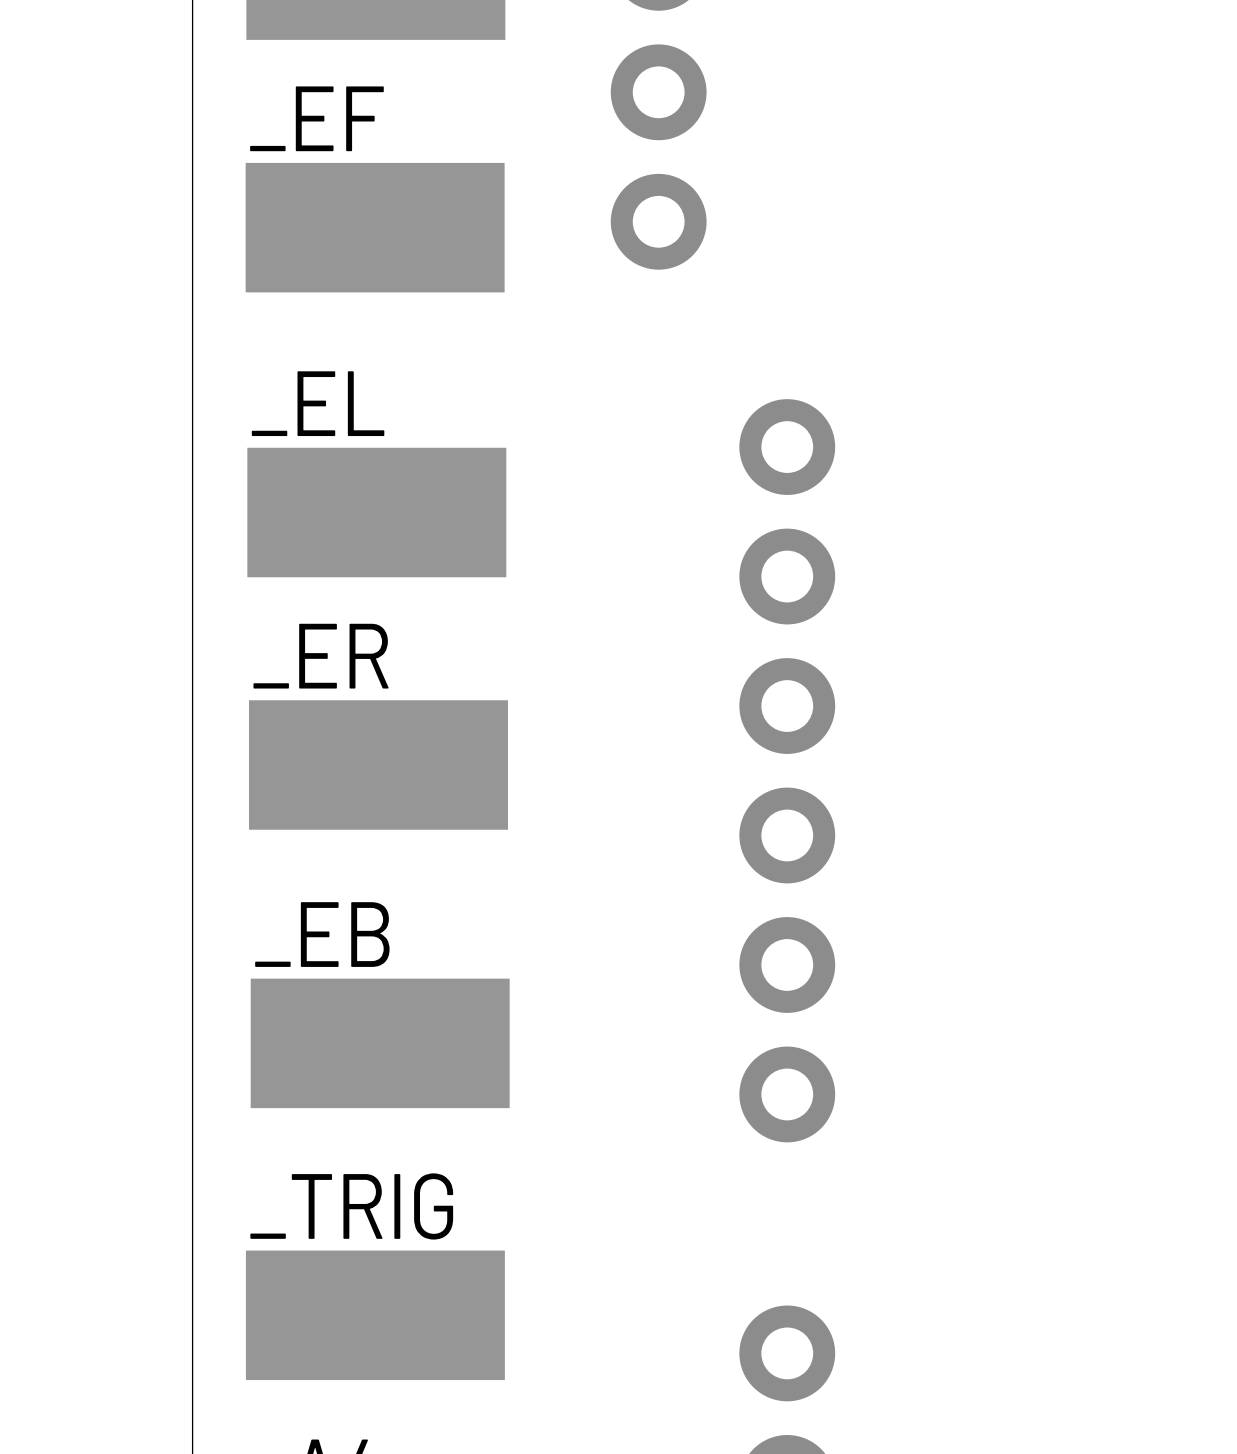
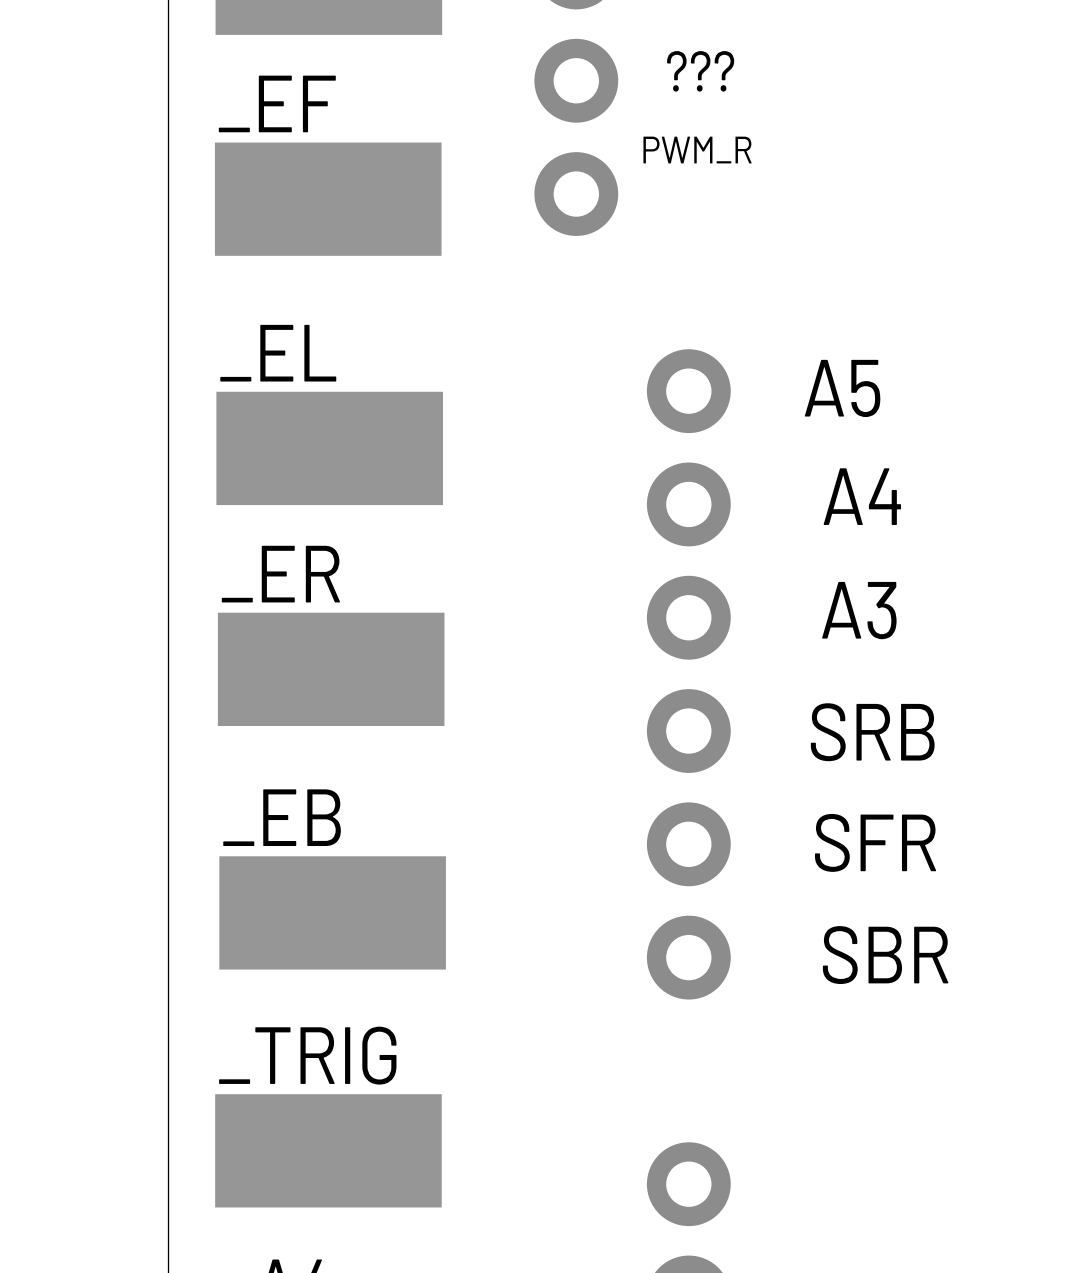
text: none -> ??? (700, 71)
text: none -> PWM_R (697, 150)
text: none -> A5 (842, 388)
text: none -> A4 (862, 496)
text: none -> A3 (859, 610)
text: none -> SRB (872, 732)
text: none -> SFR (875, 842)
text: none -> SBR (885, 955)

